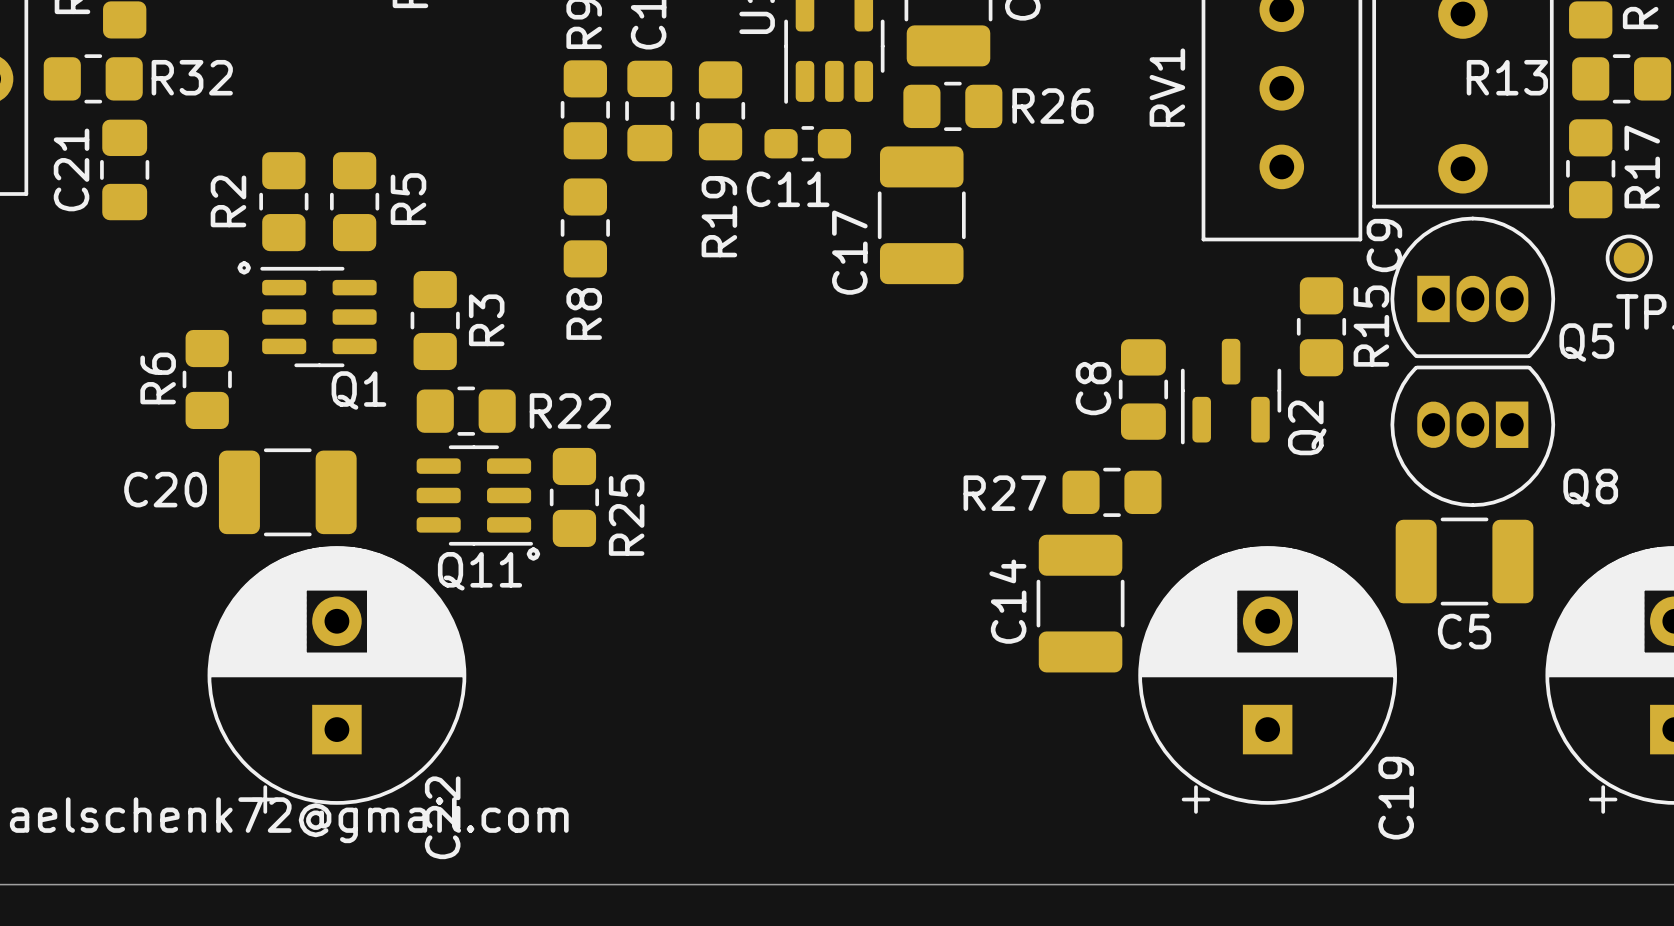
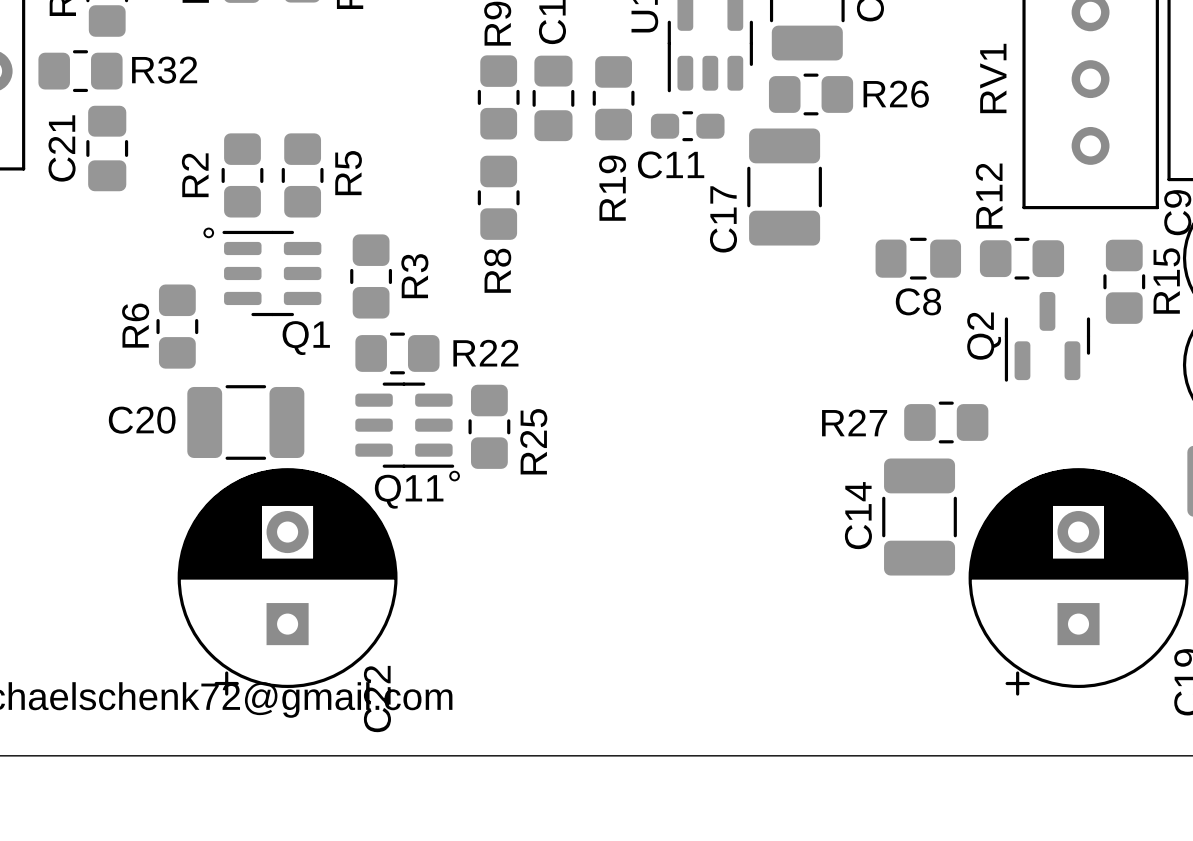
R12: none -> (1021, 258)
C8 name position: C8 (1093, 388) -> C8 (918, 301)
C8 rotation: 0° (1143, 389) -> 90° clockwise (918, 258)
C8 position: (1143, 389) -> (918, 258)
Q2 name position: Q2 (1307, 427) -> Q2 (984, 336)

